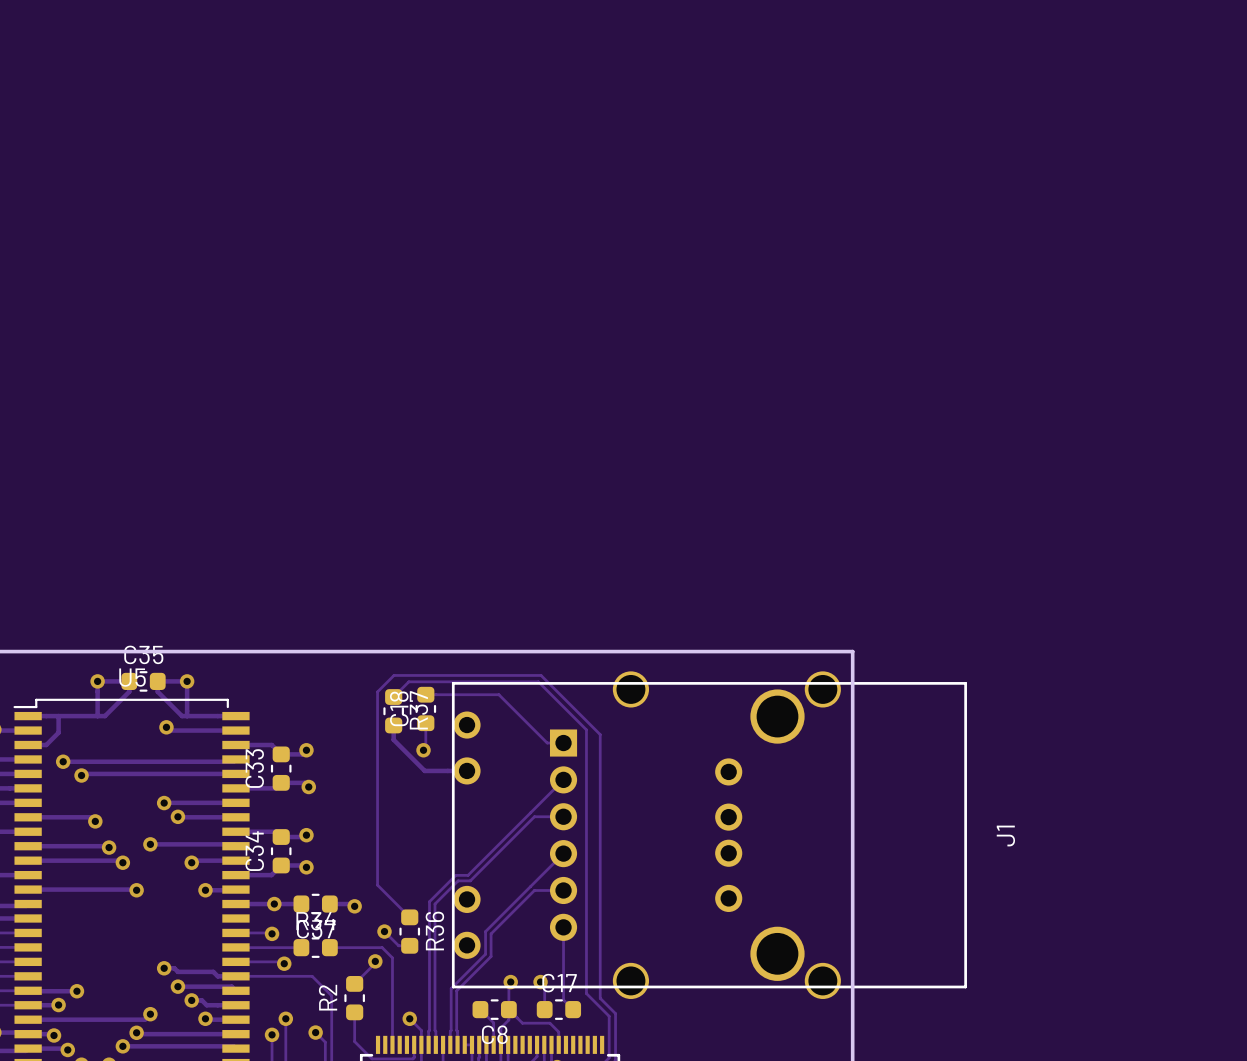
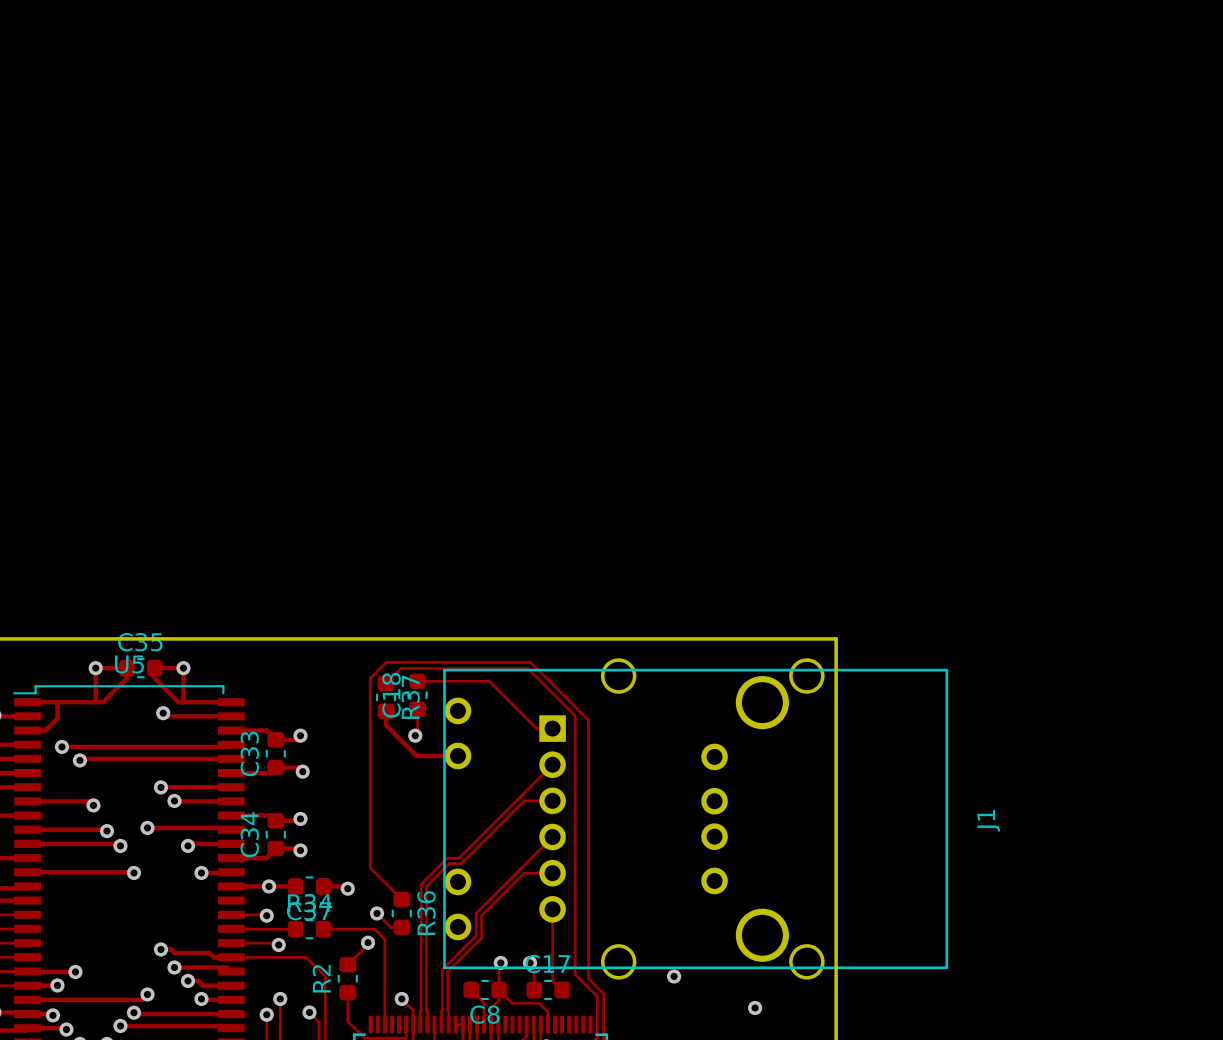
via: none -> (674, 976)
via: none -> (755, 1007)

